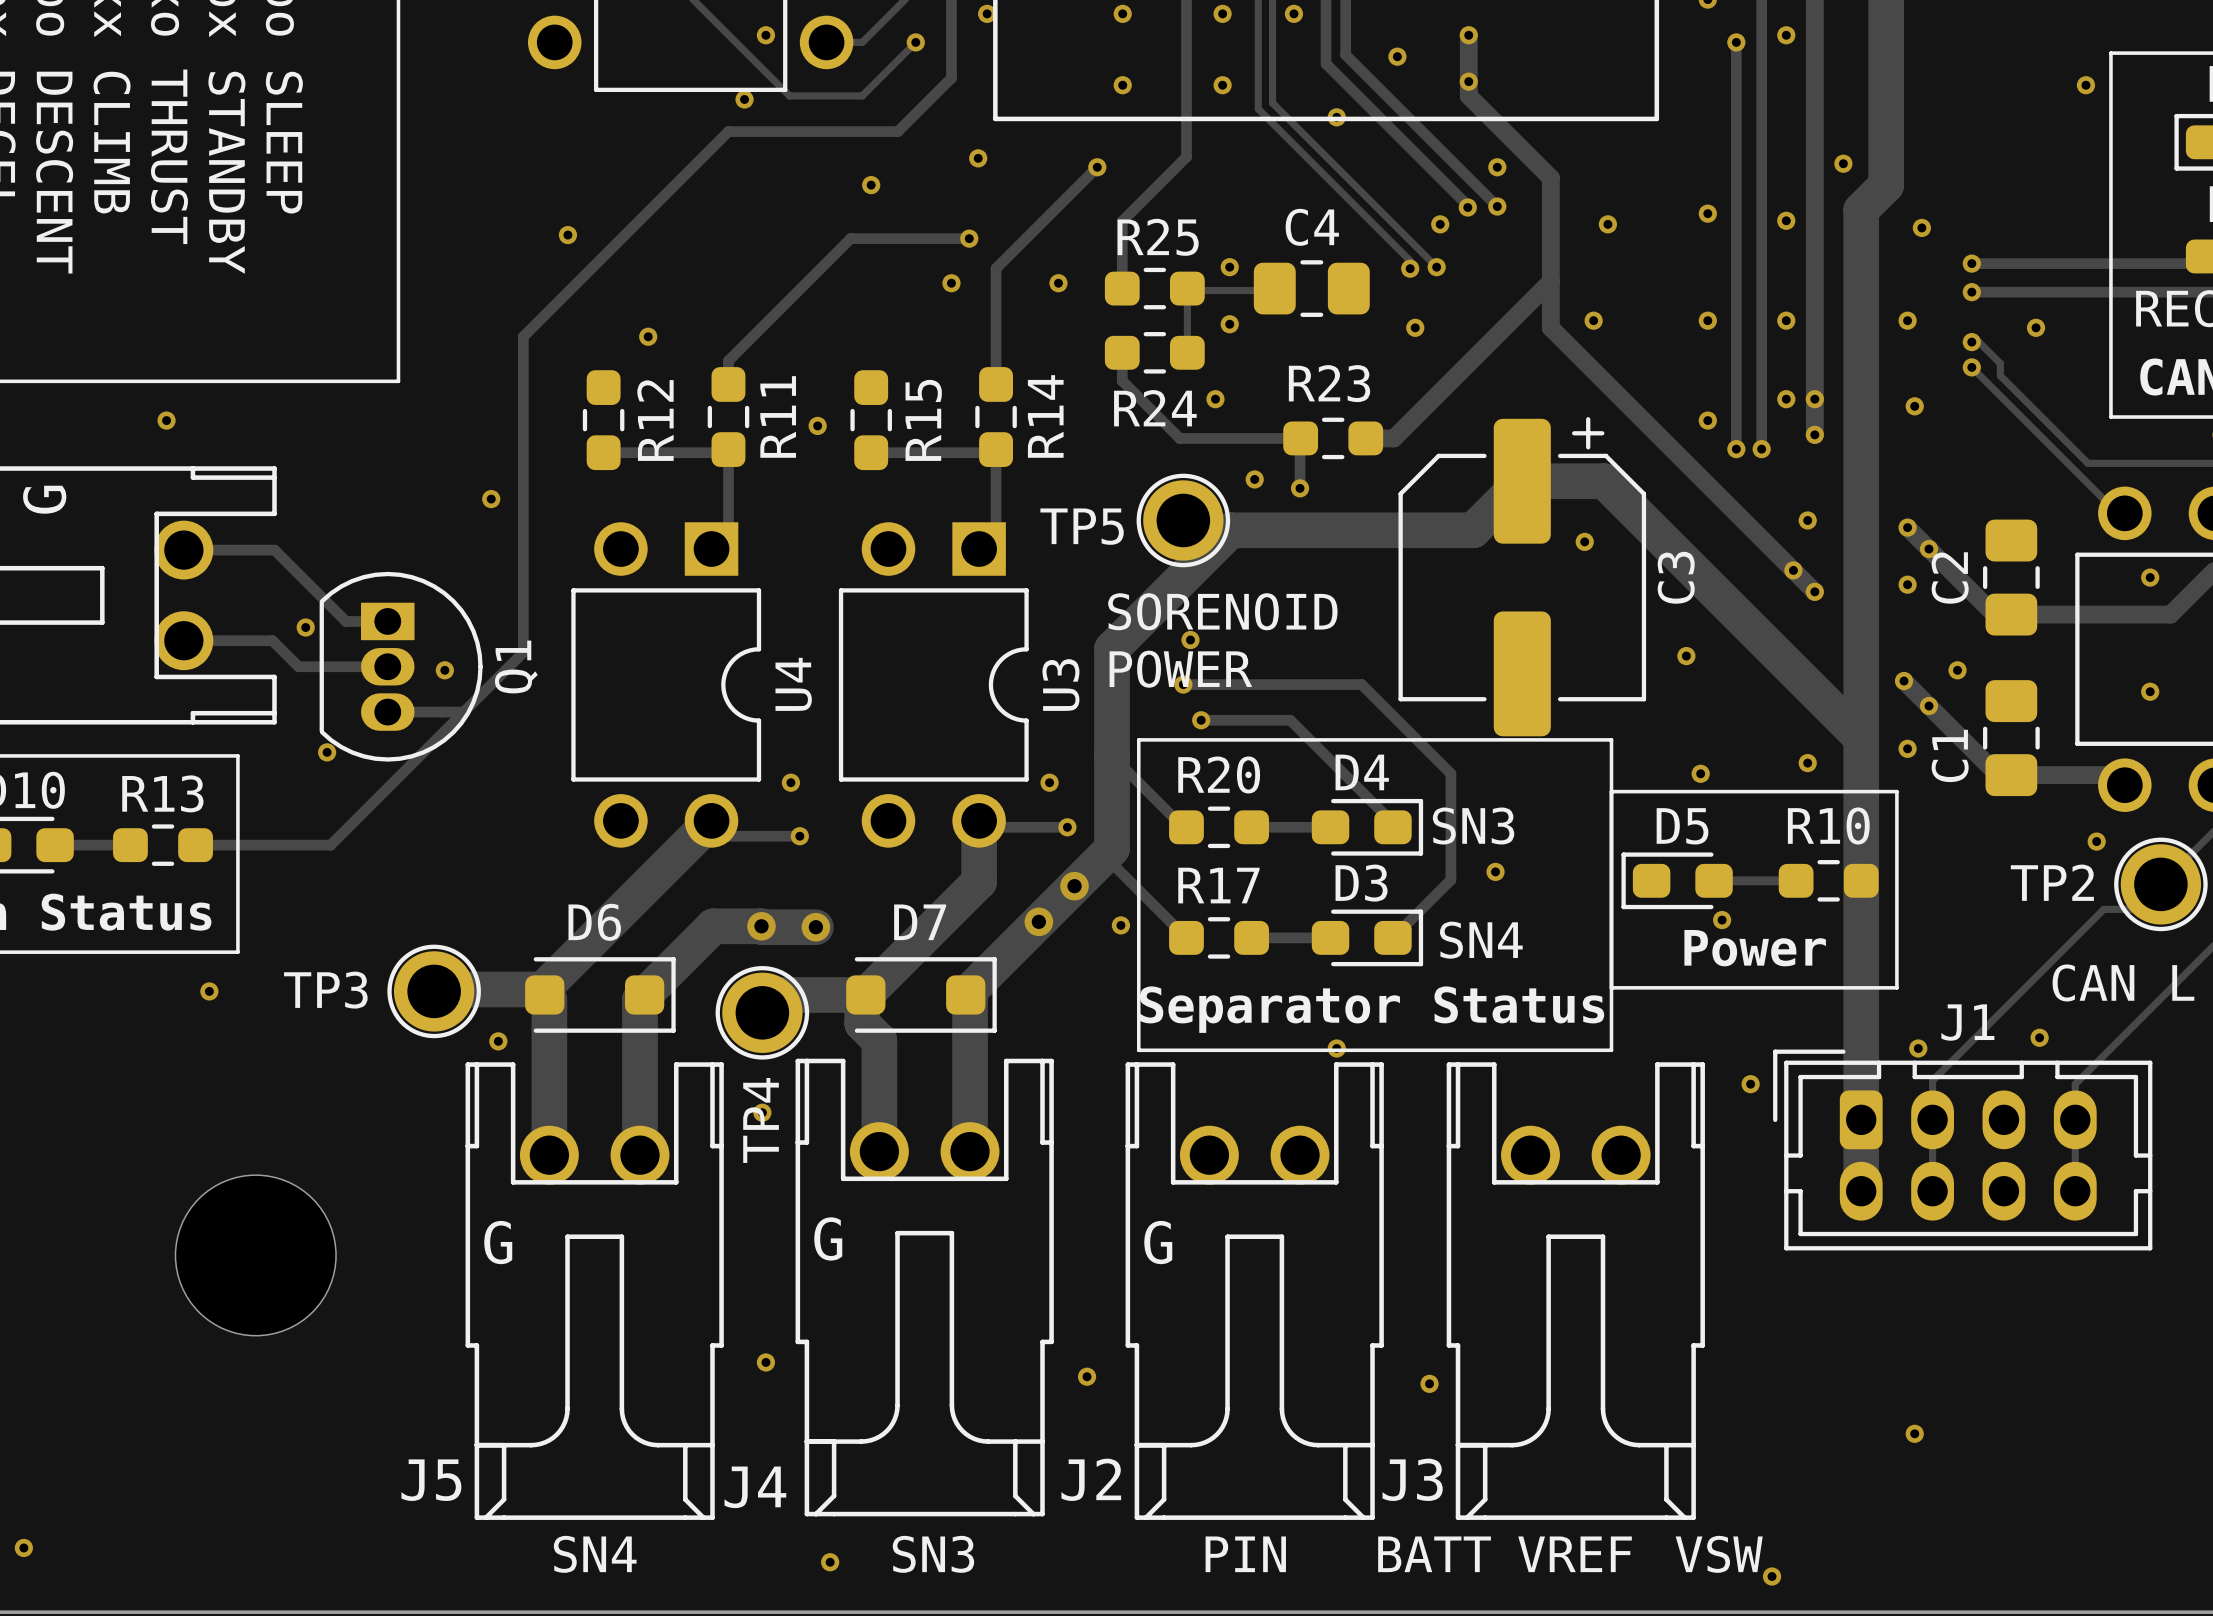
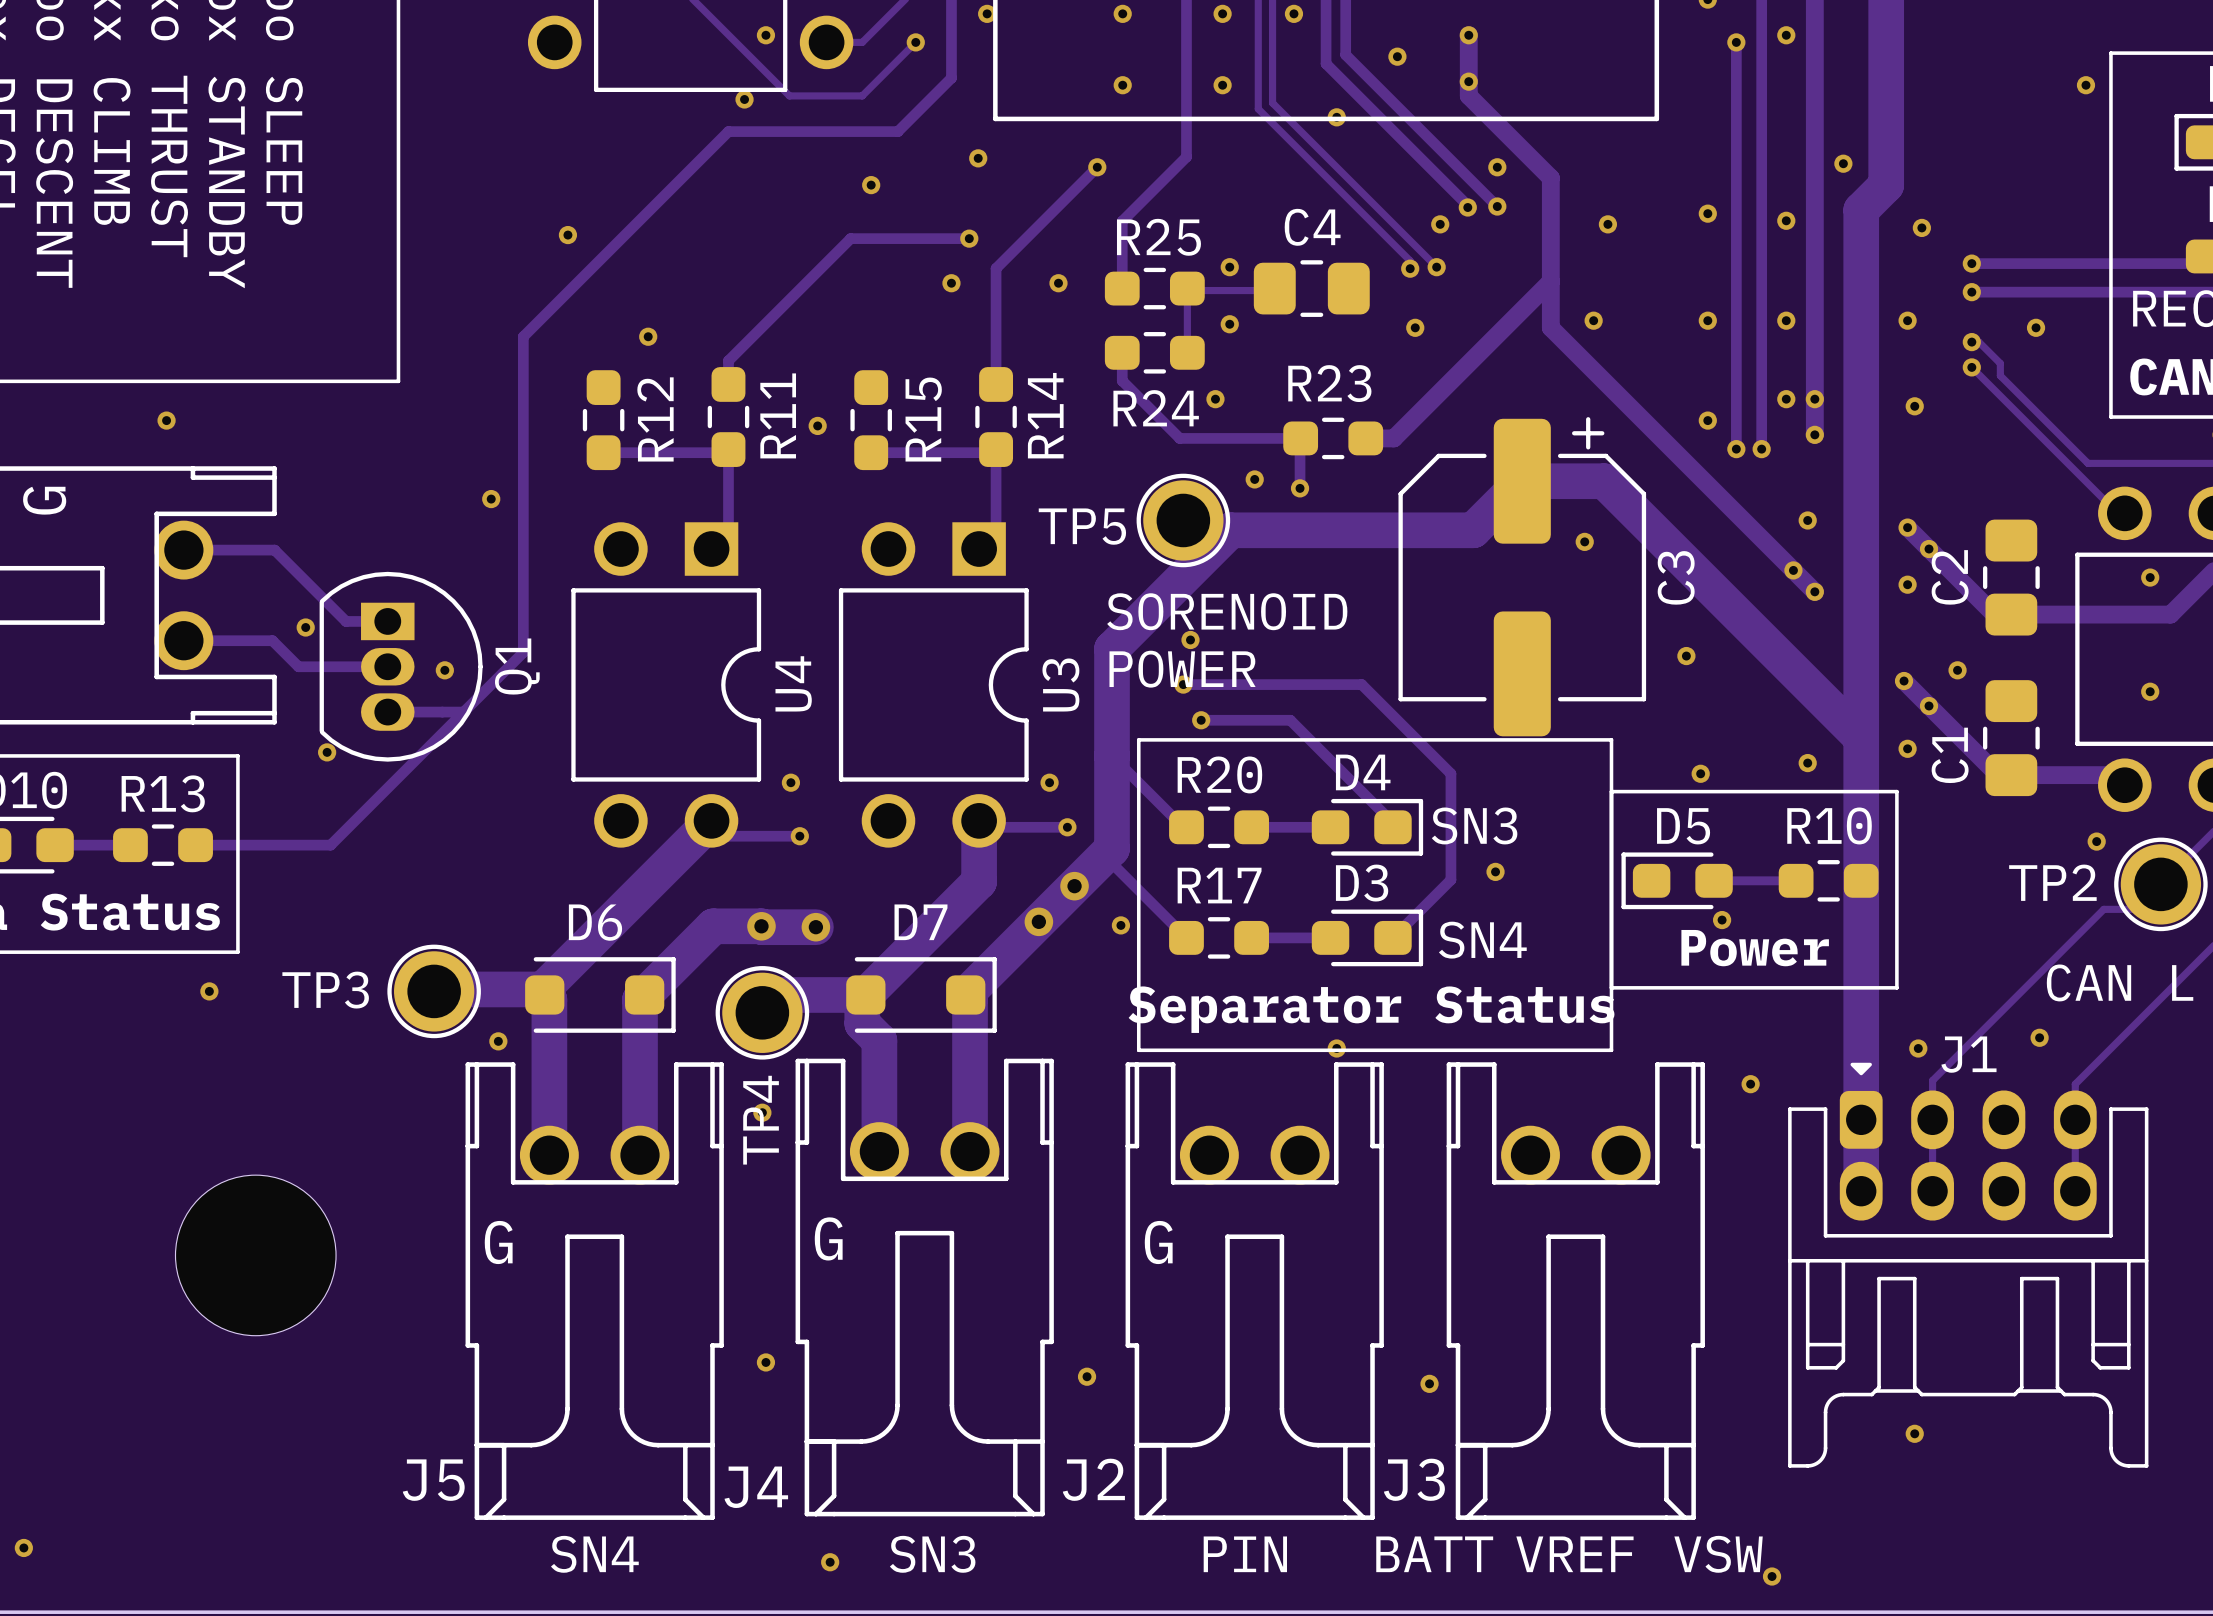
J1 name position: J1 (1967, 1022) -> J1 (1968, 1054)
J1 footprint: [1773, 1049, 2153, 1251] -> [1788, 1062, 2149, 1468]

